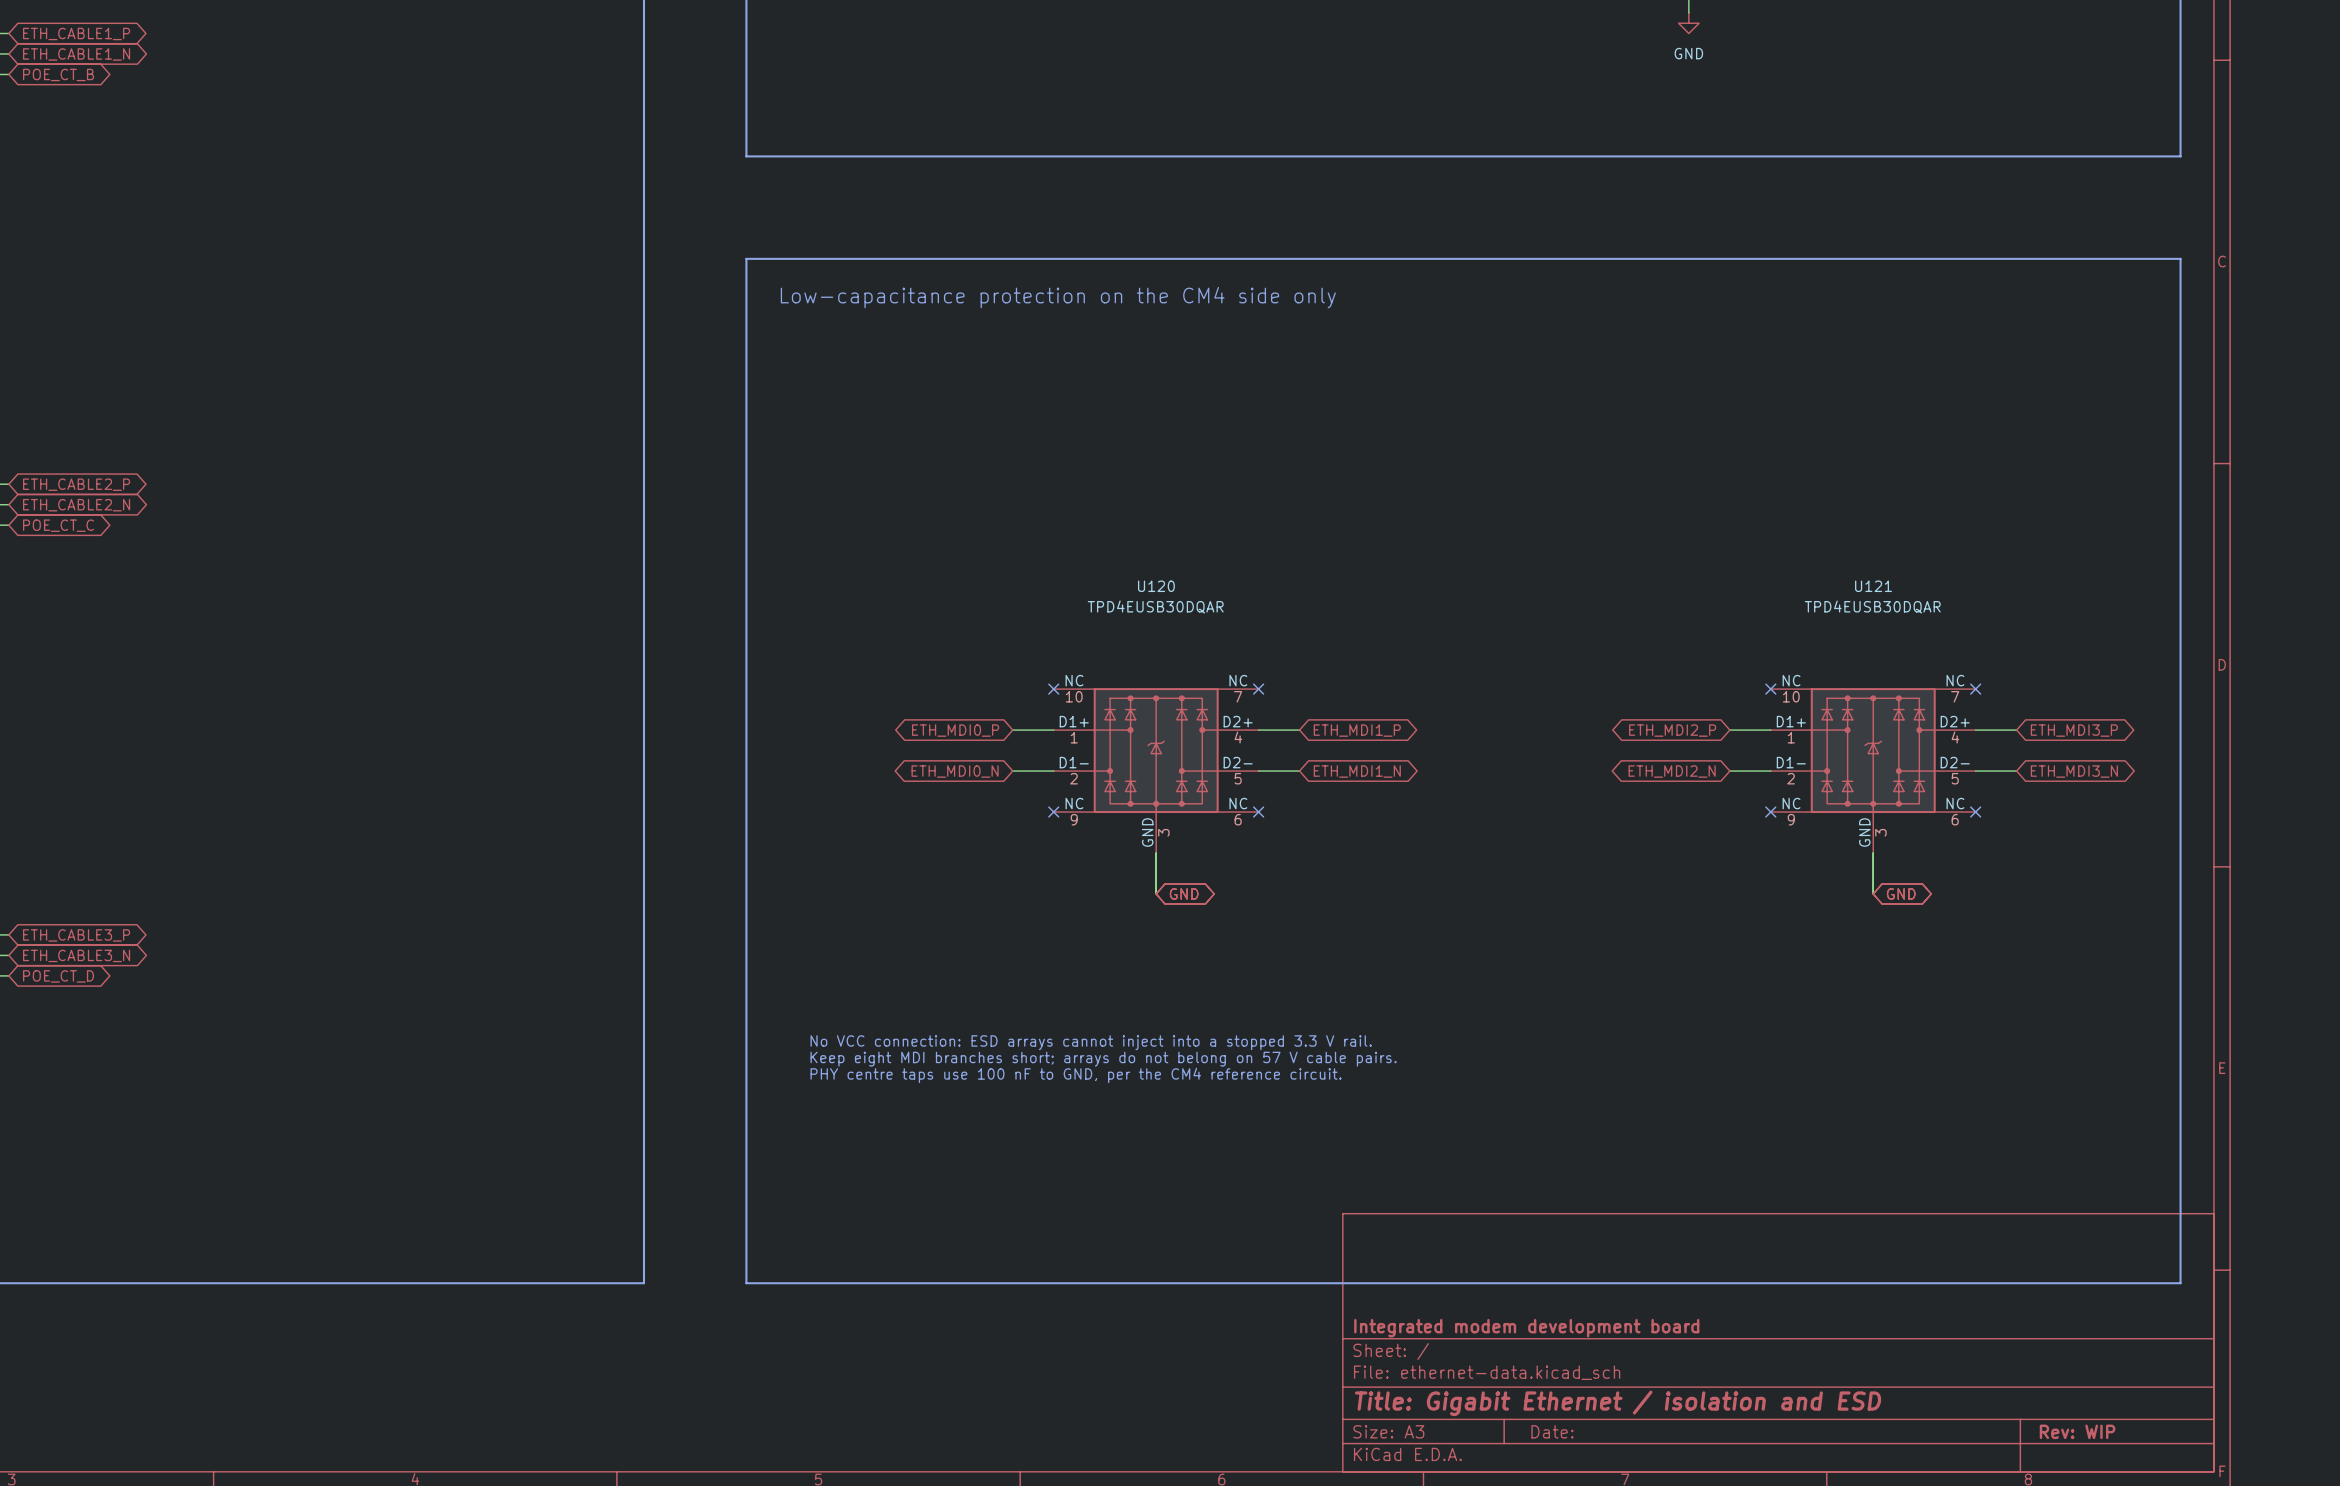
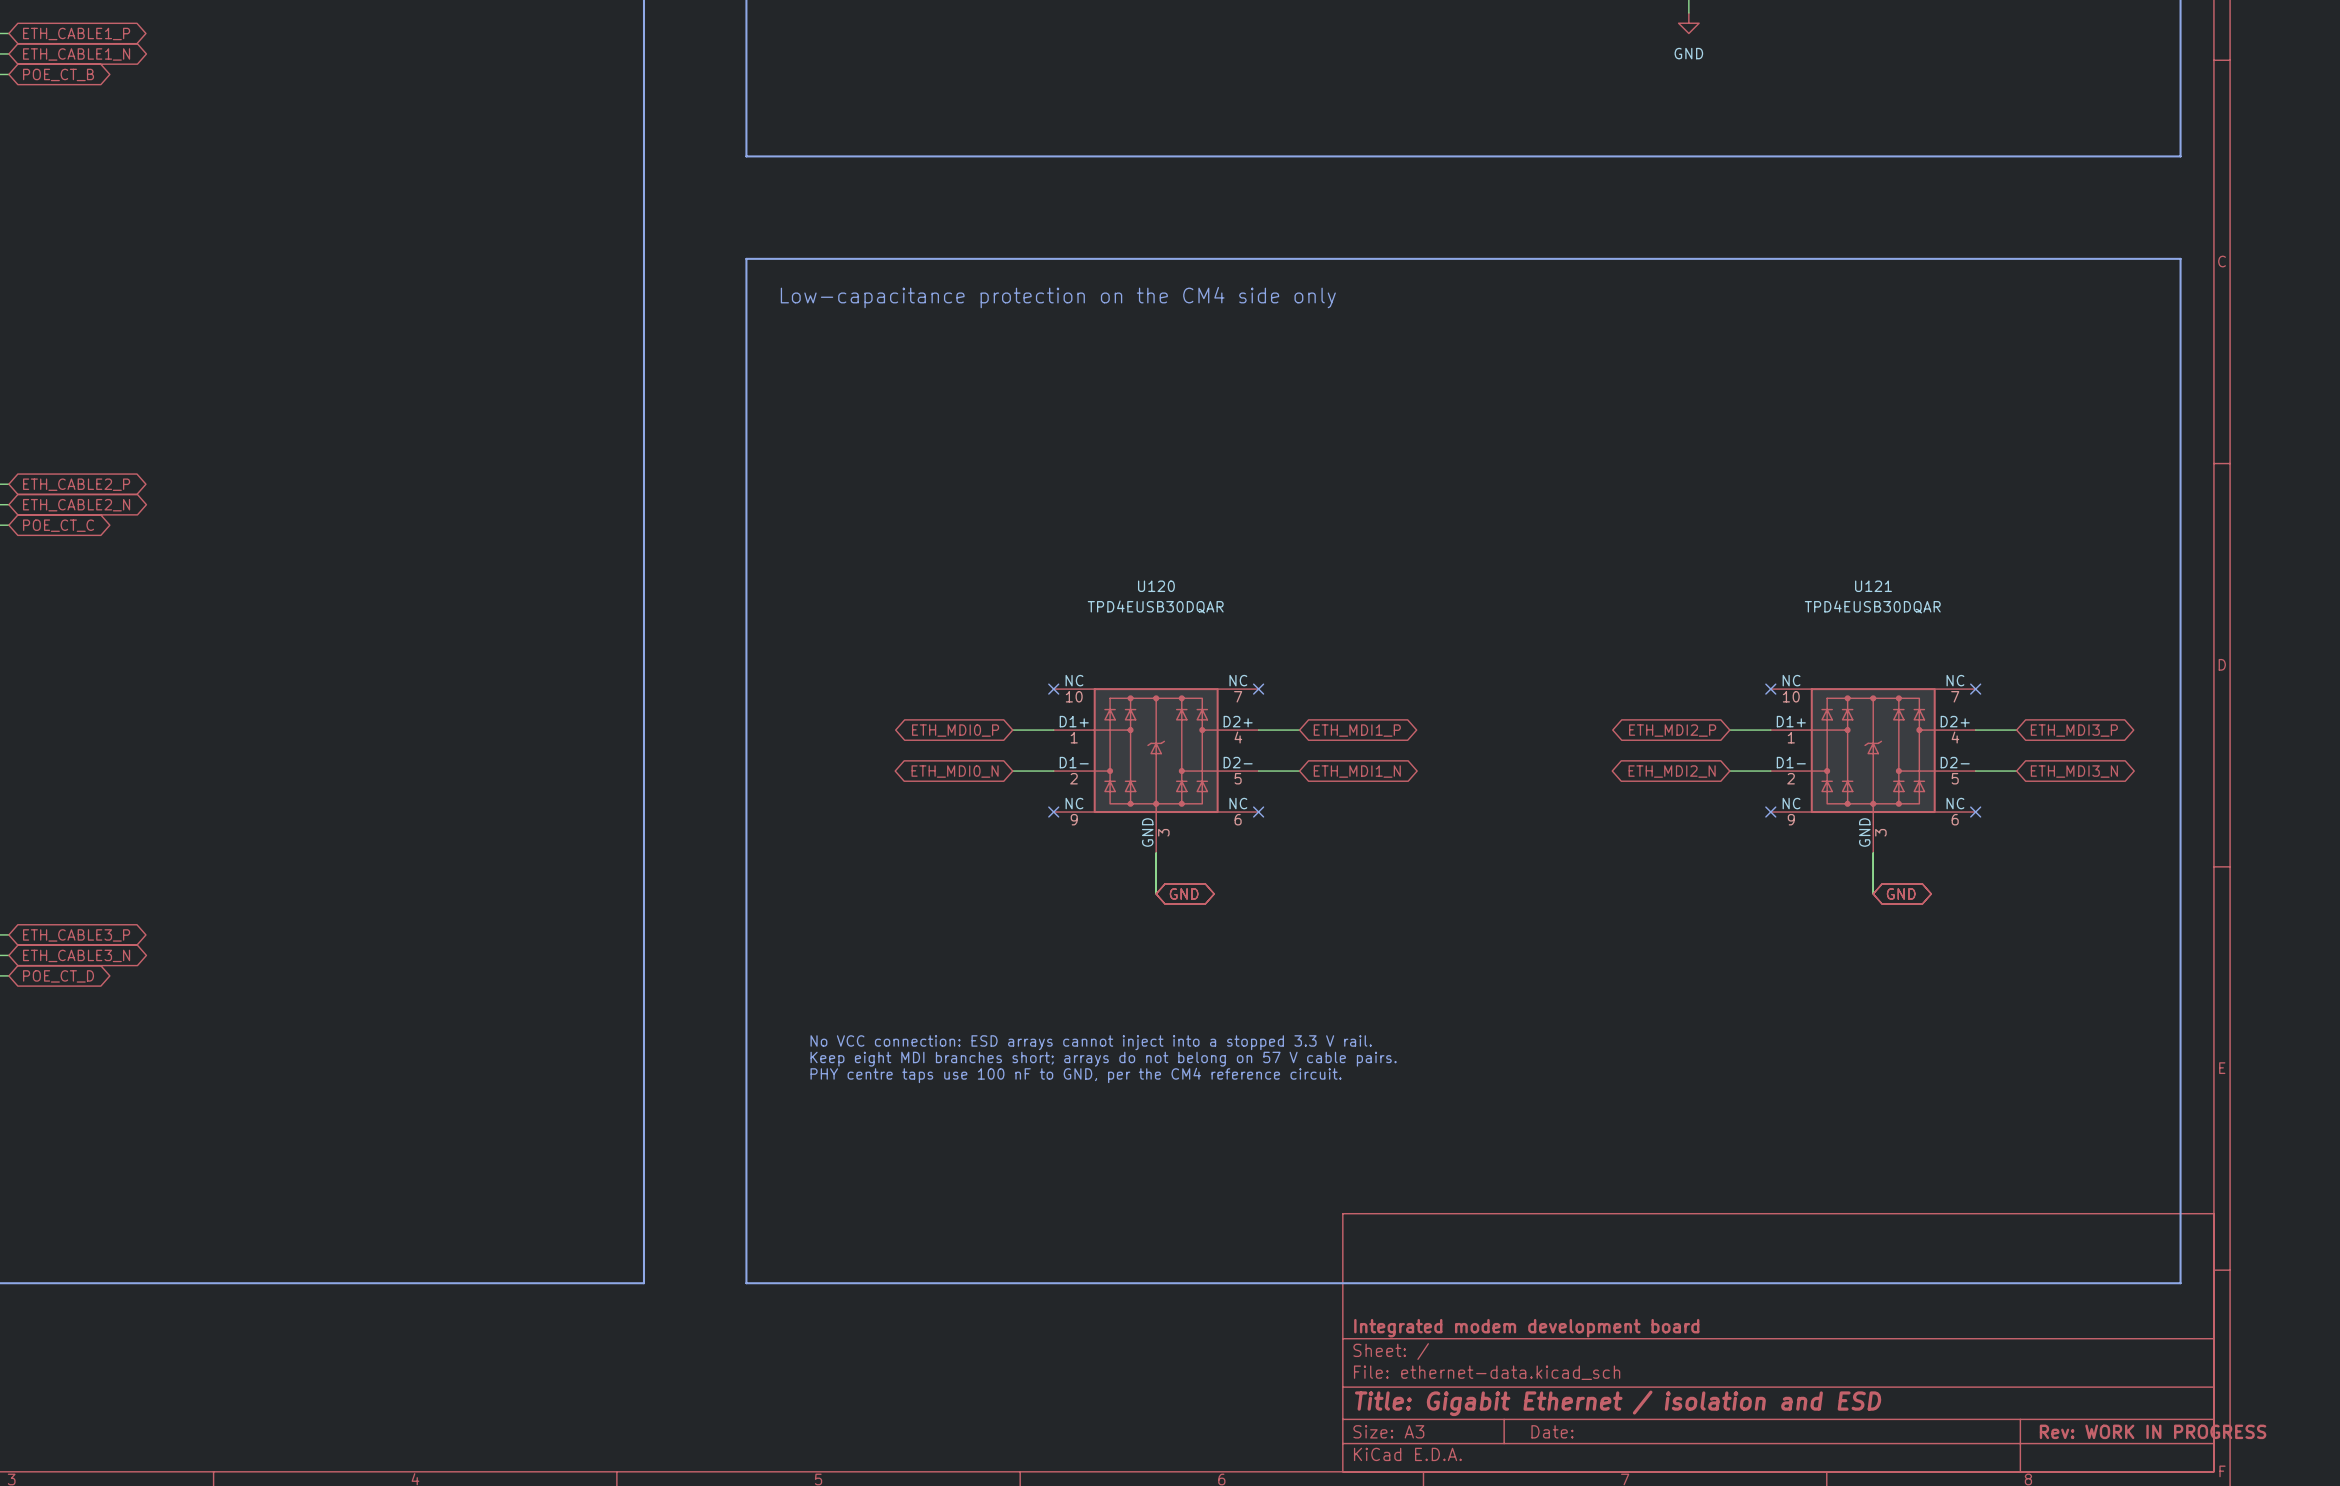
title block: Rev: WIP (2077, 1431) -> Rev: WORK IN PROGRESS (2153, 1431)

